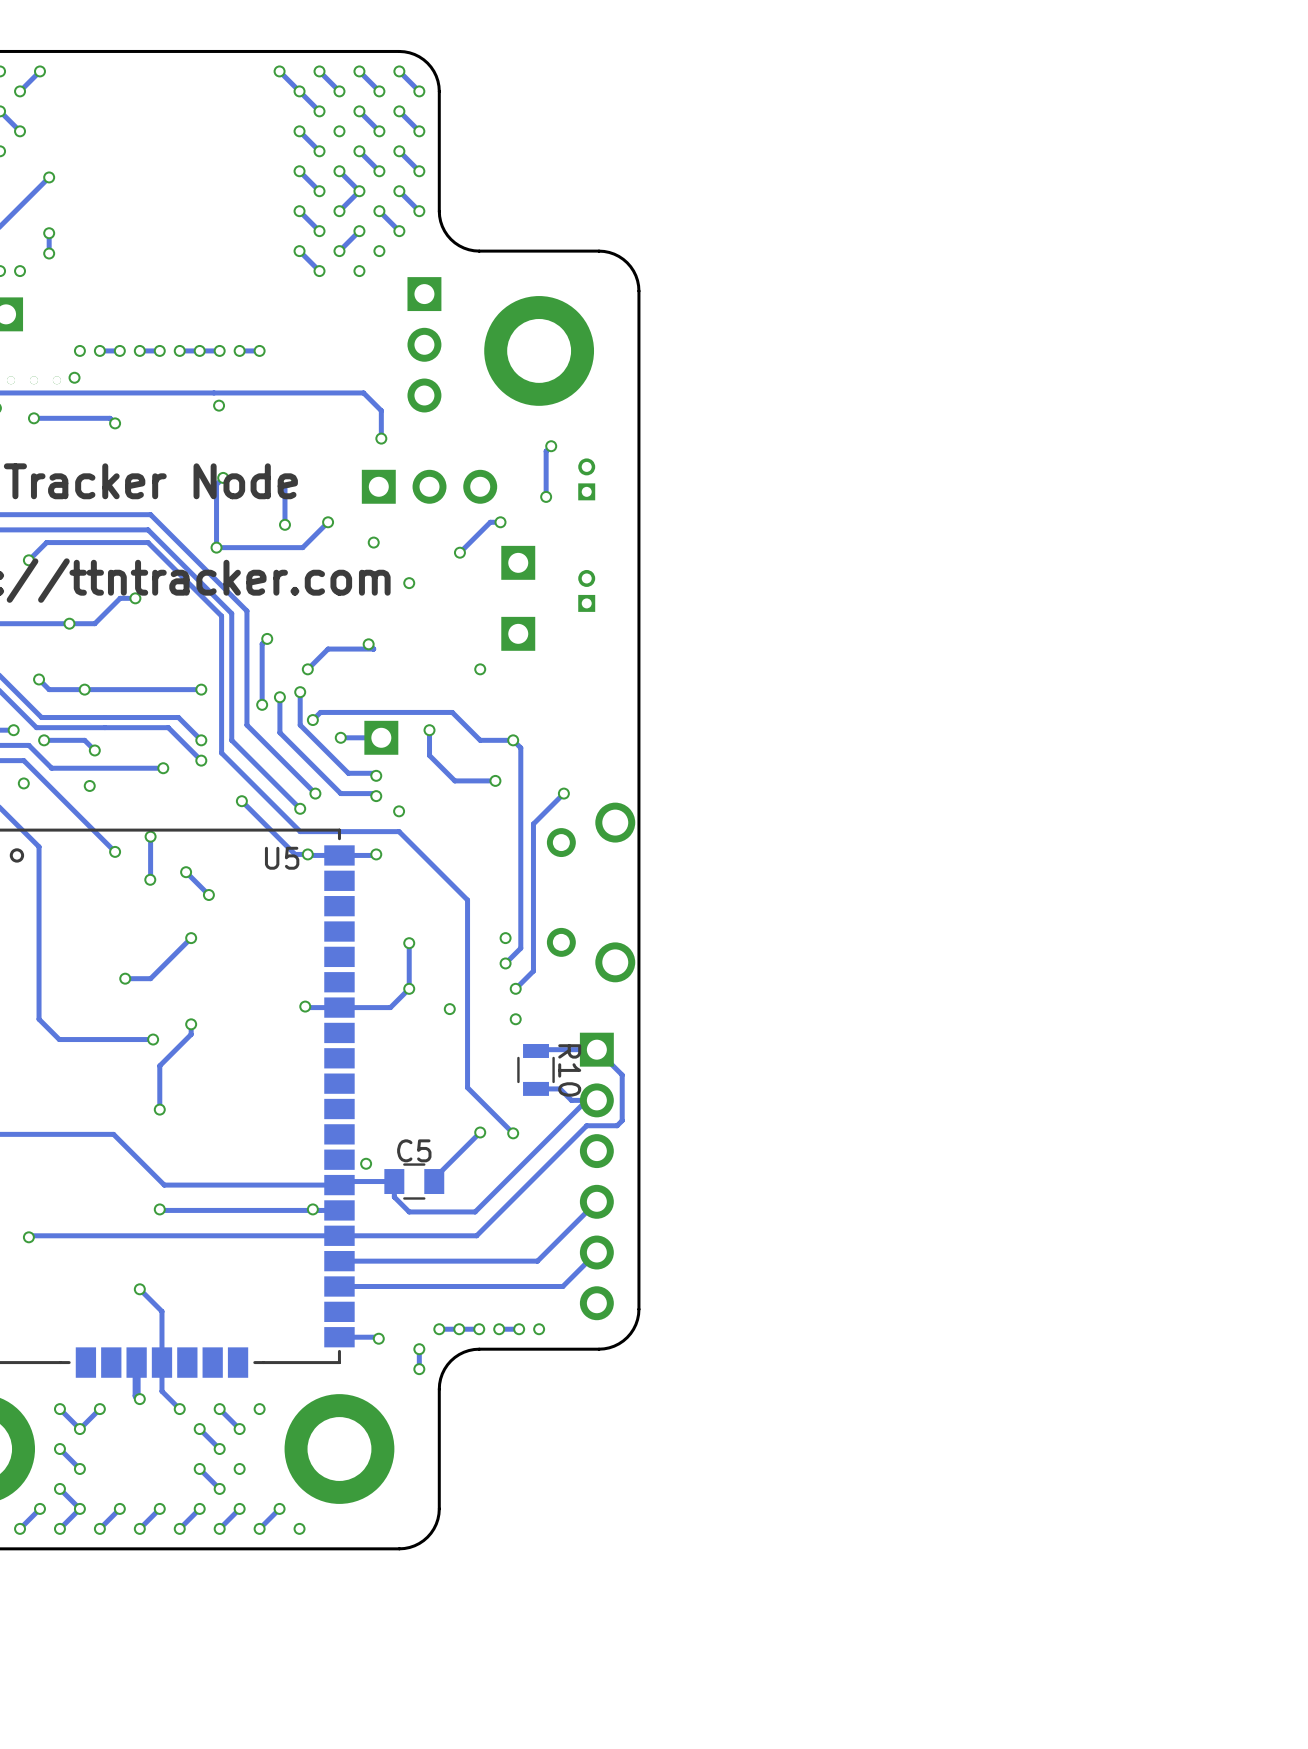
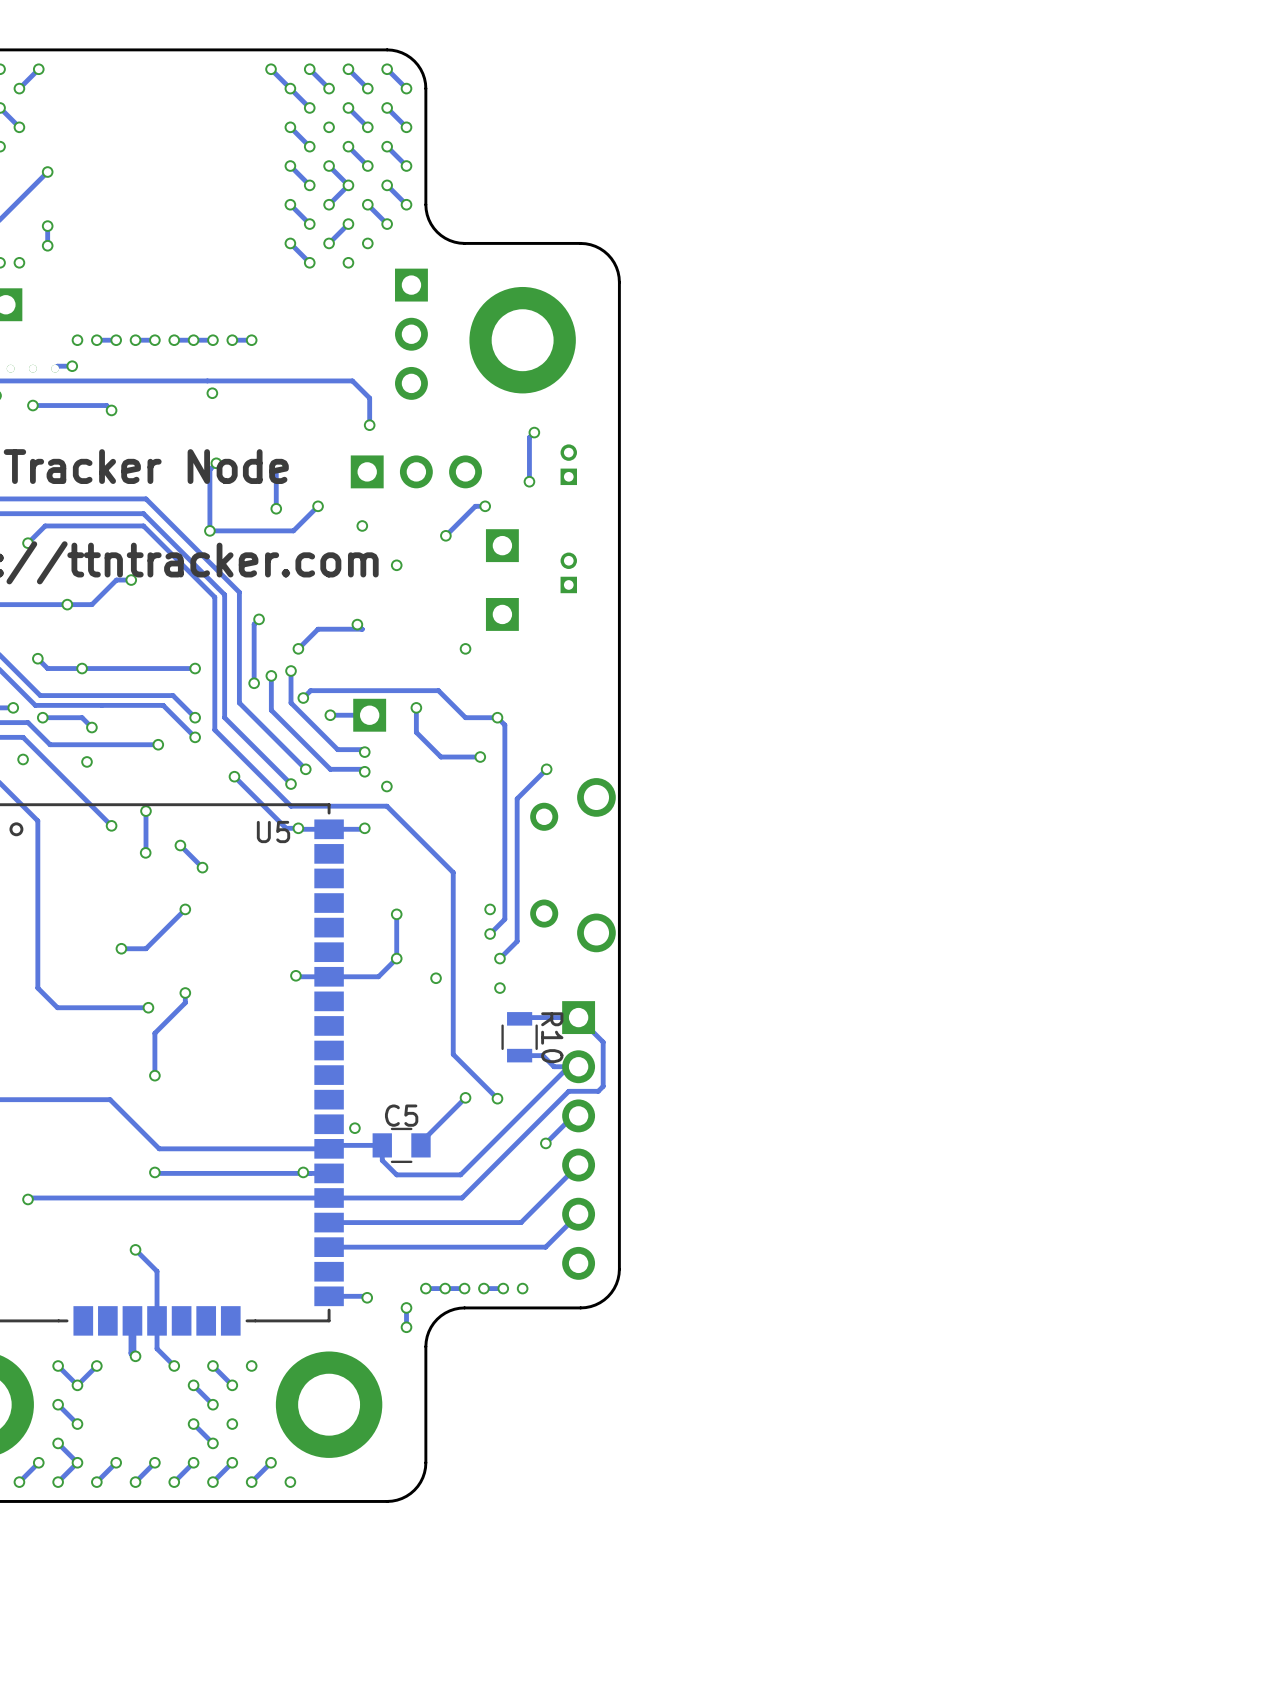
track: none -> (72, 366) (57, 366) (55, 368)
track: none -> (578, 1115) (573, 1115) (545, 1143)
via: none -> (545, 1143)

